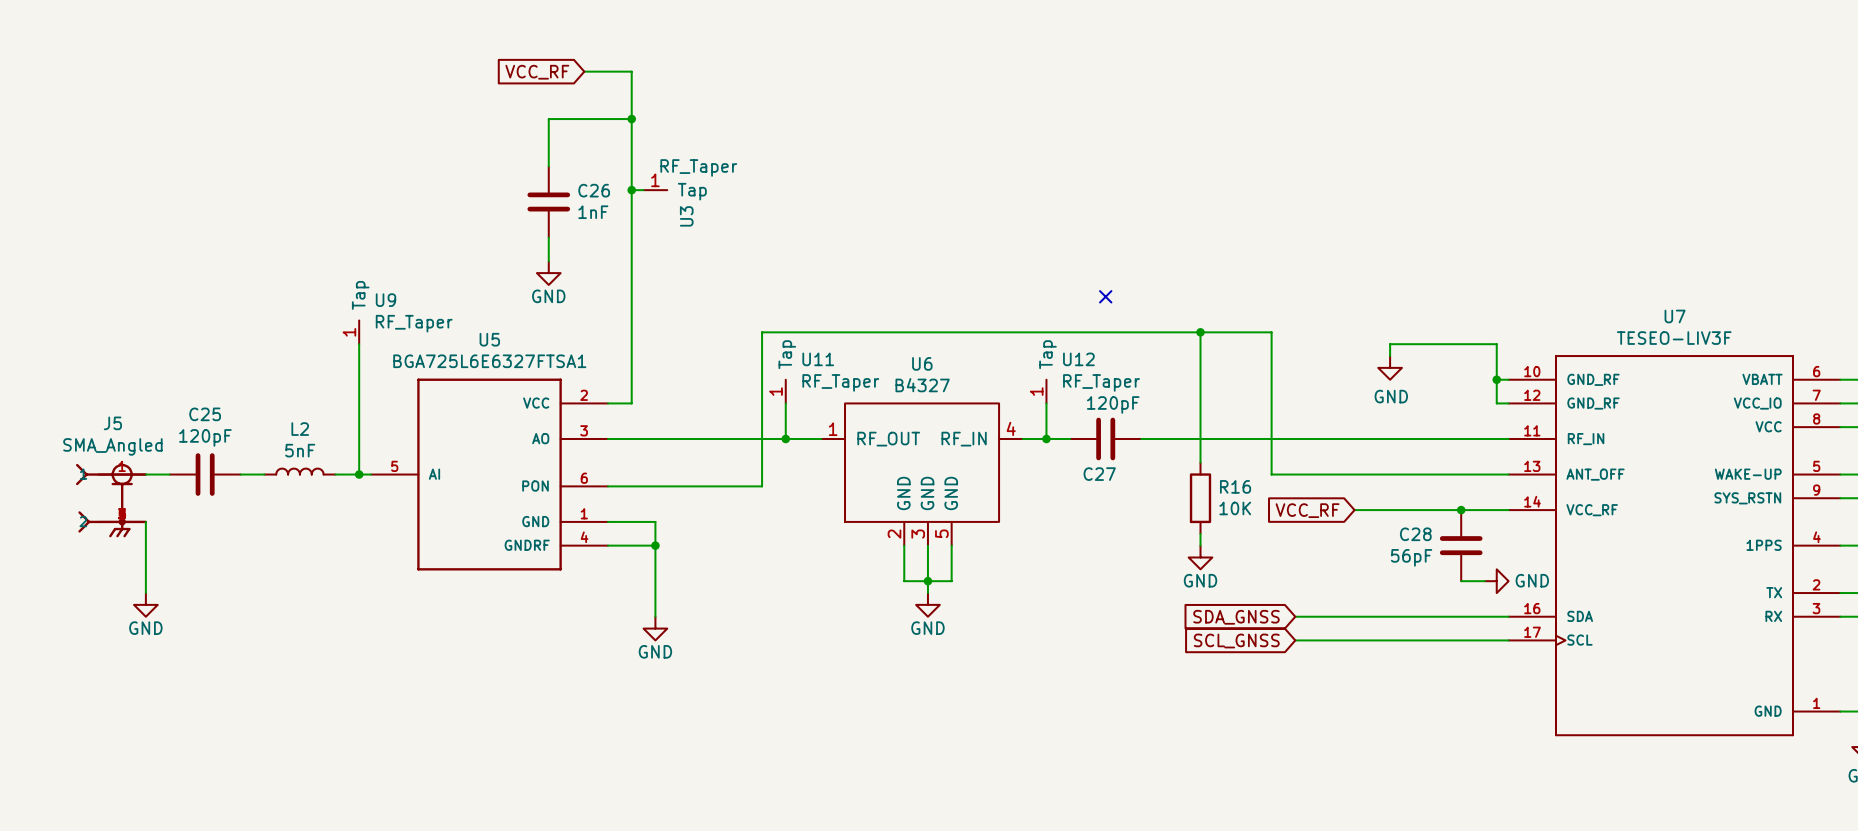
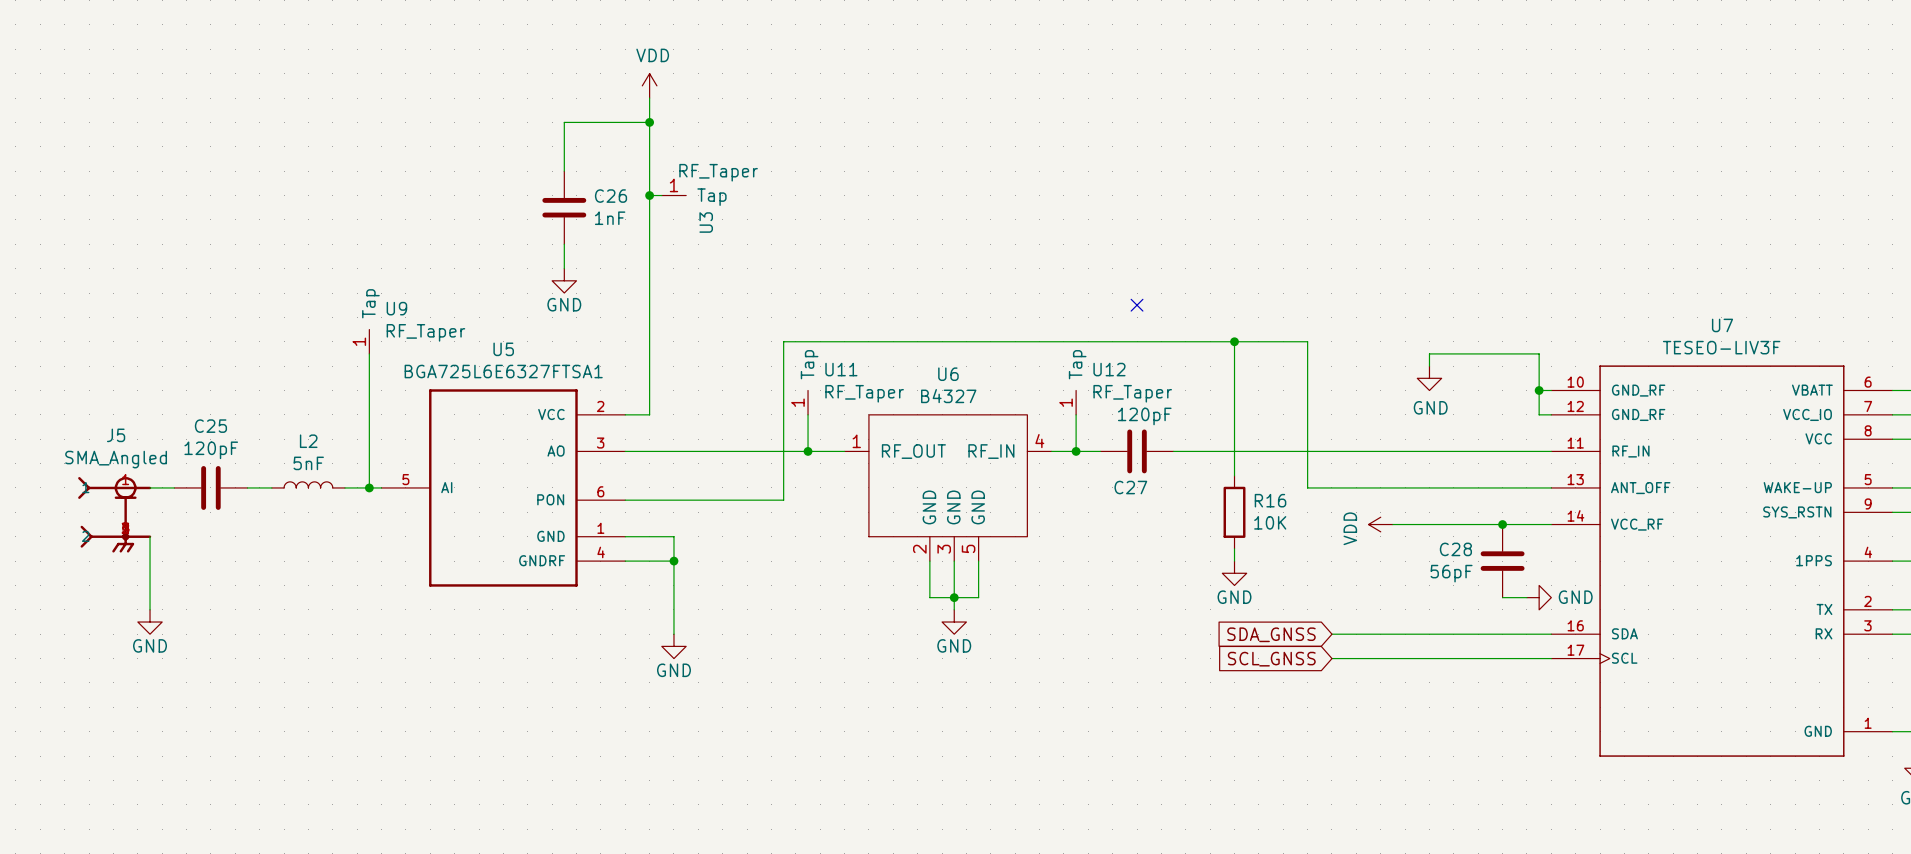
wire: (584, 71) (631, 71) (631, 95) -> none
global label: VCC_RF (537, 72) -> none
power symbol: none -> VDD (649, 85)
global label: VCC_RF (1307, 510) -> none
power symbol: none -> VDD (1380, 524)

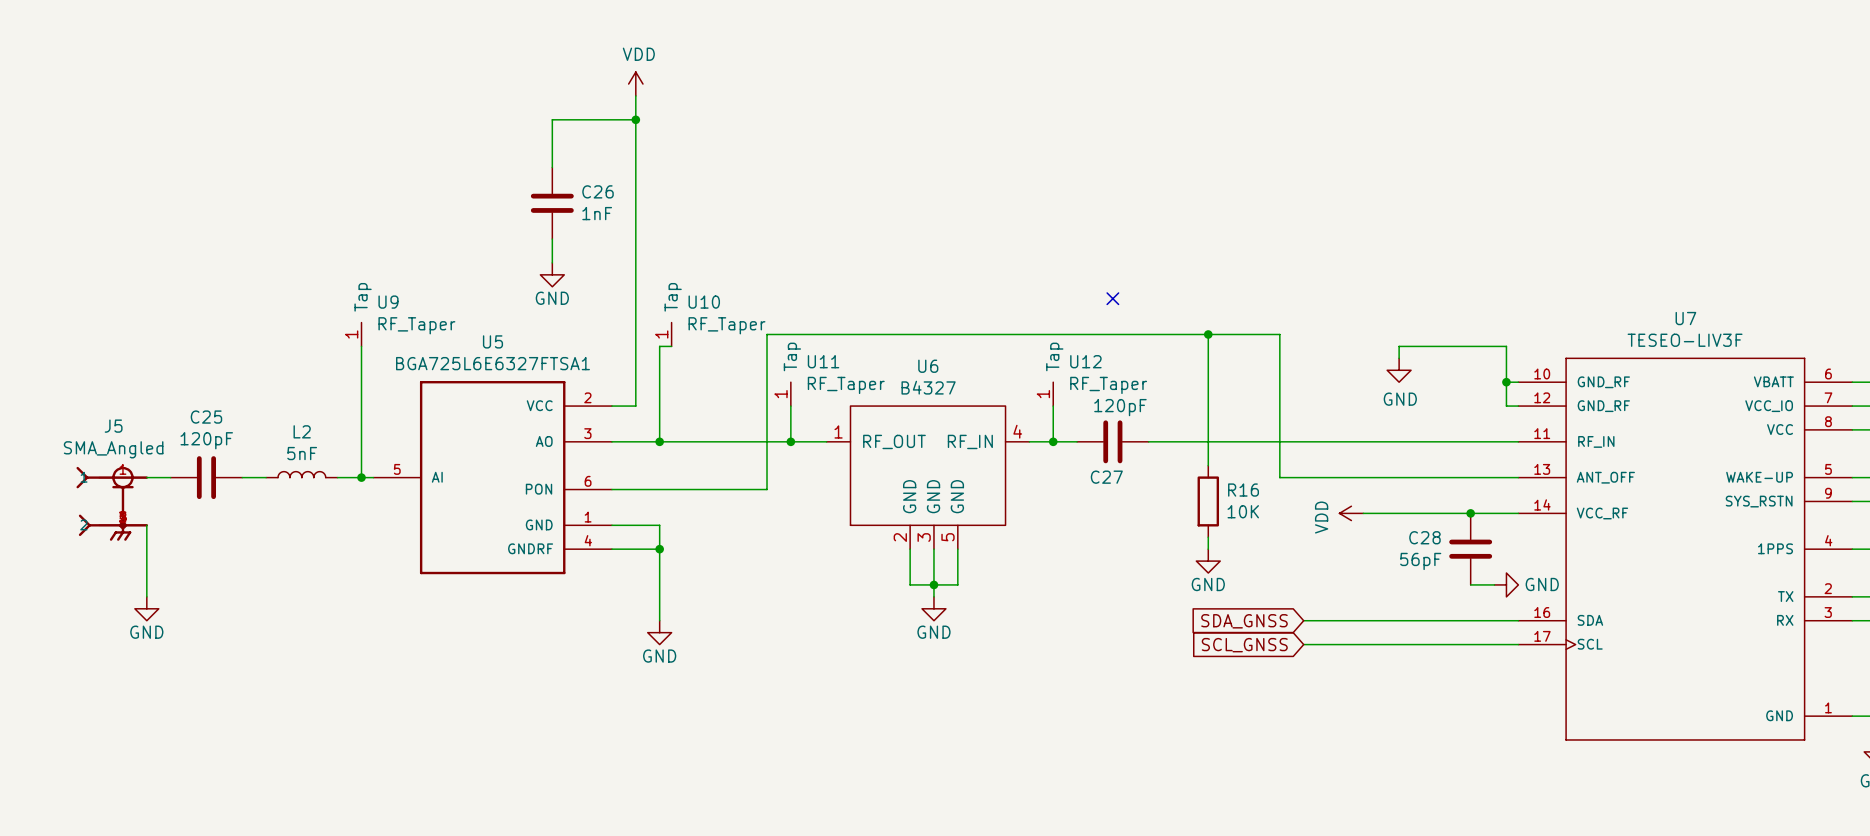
wire: (649, 195) (661, 195) -> none
junction: (649, 195) -> none
U3: RF_Taper (673, 195) -> none
U10: none -> RF_Taper (671, 334)
wire: none -> (671, 346) (659, 346) (659, 441)
junction: none -> (659, 441)

